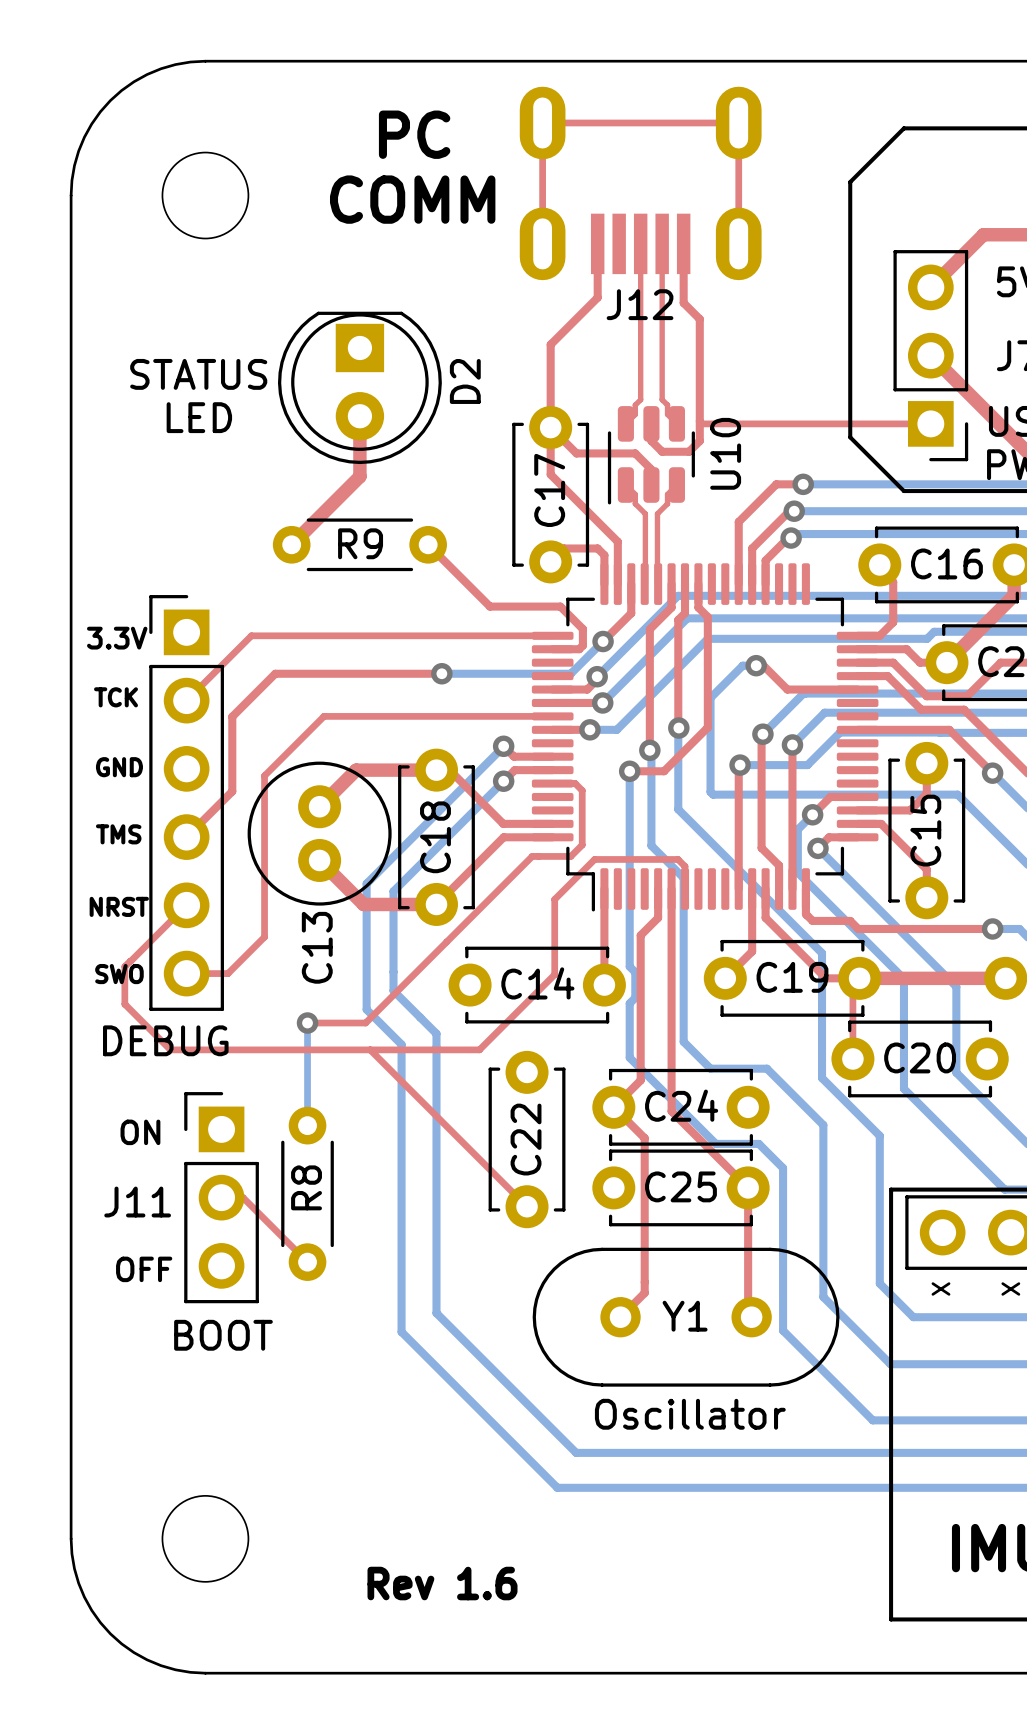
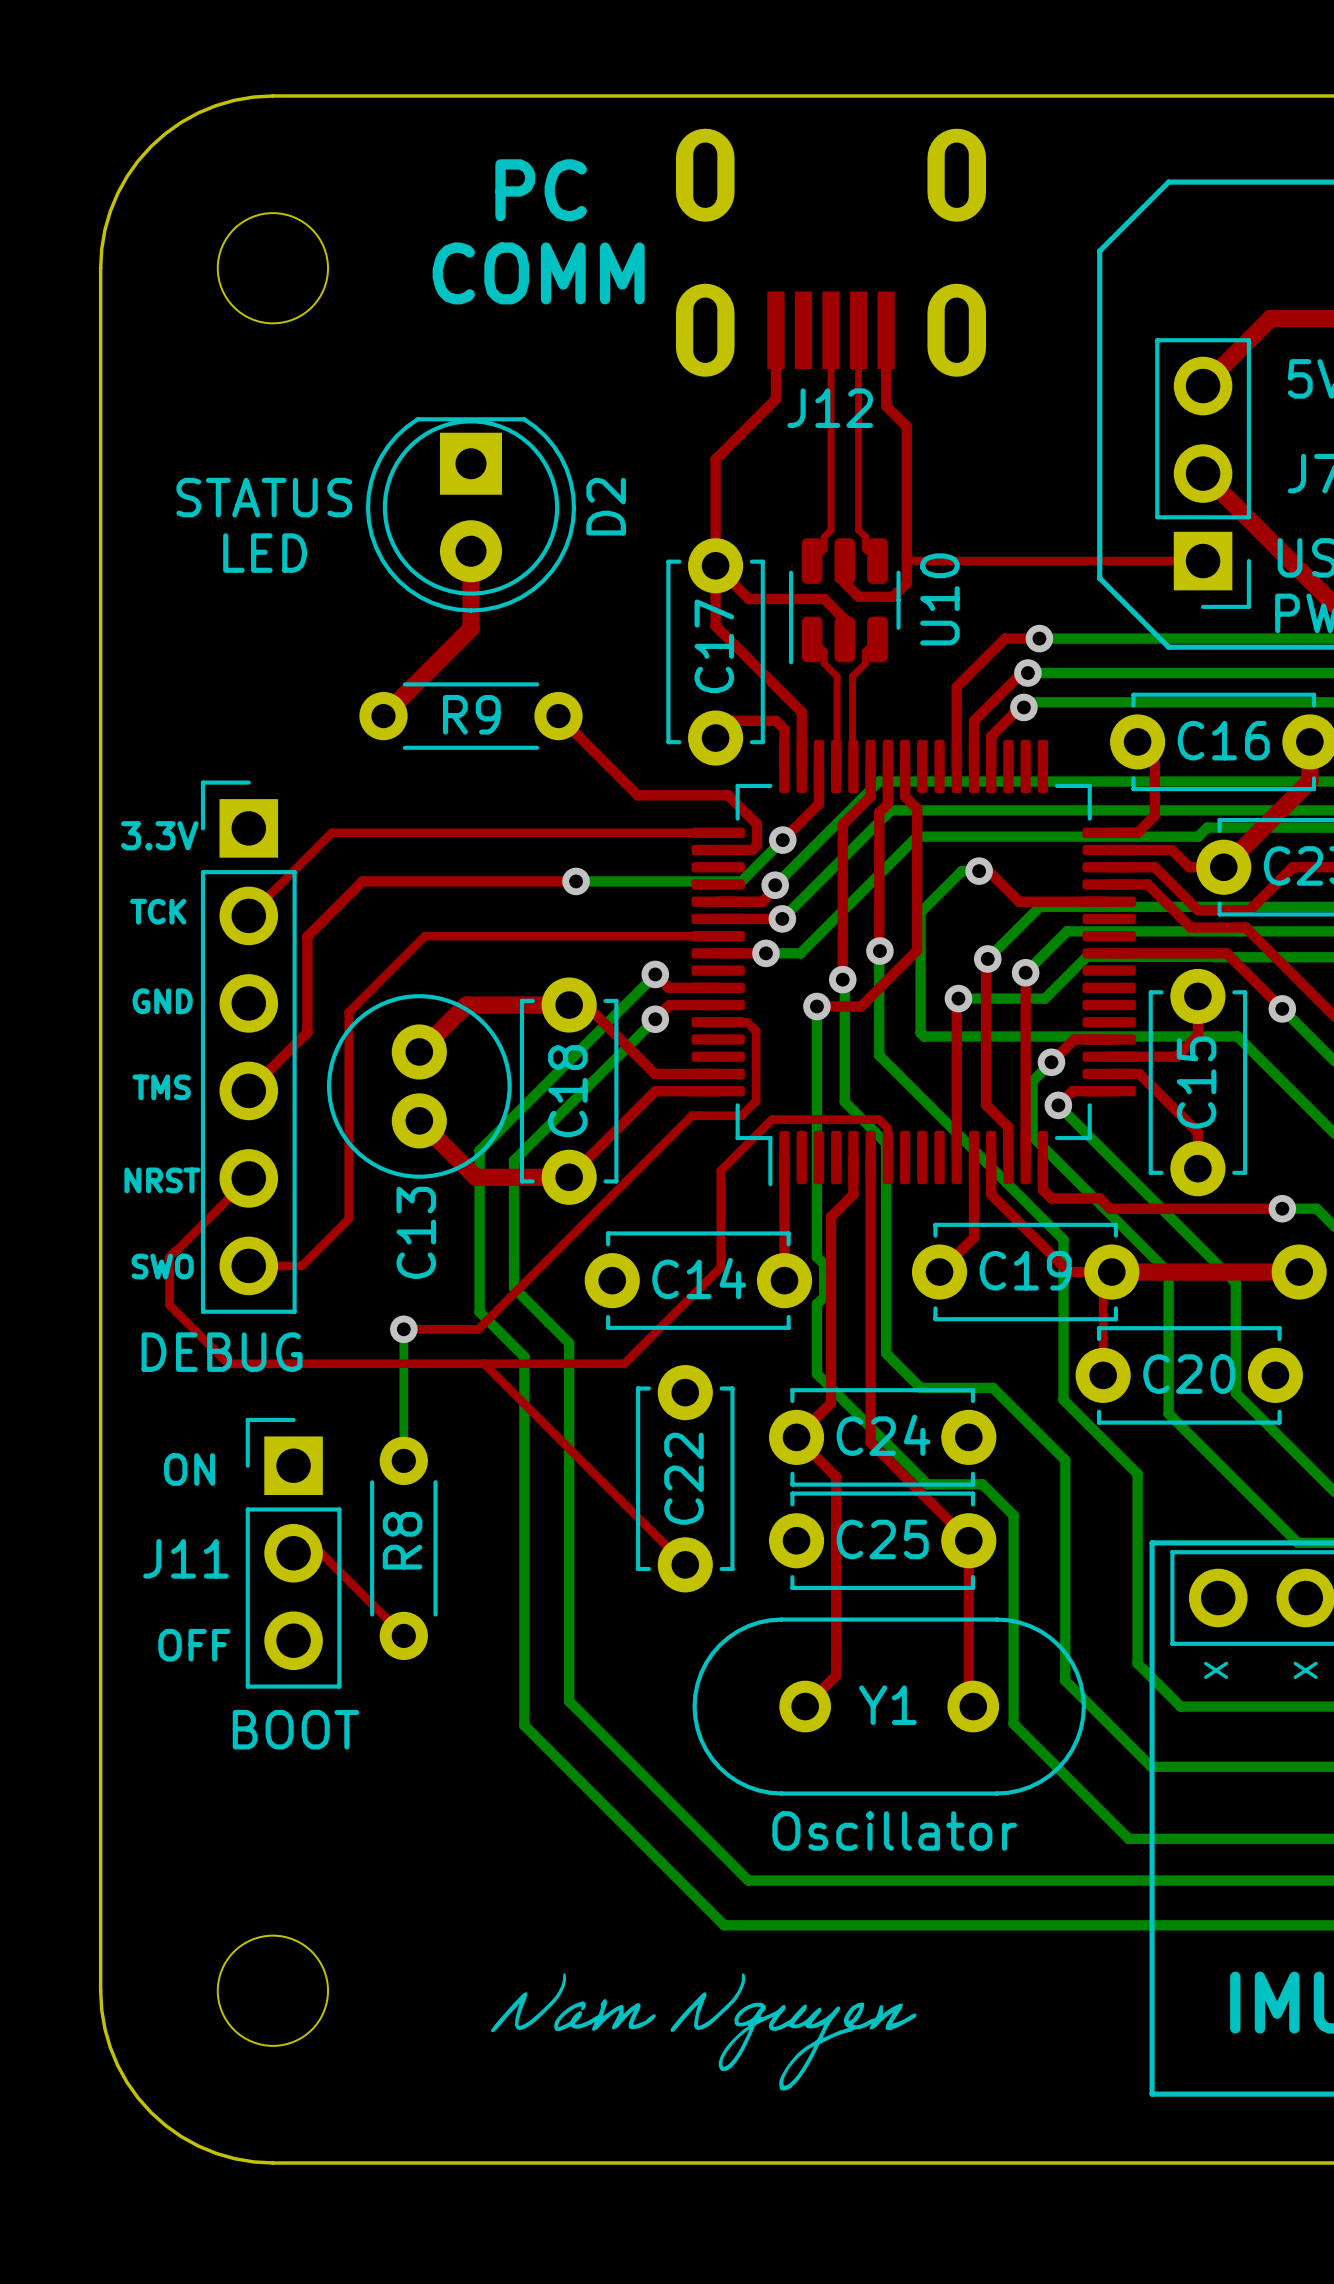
top track: (542, 243) (542, 122) (738, 122) (738, 243) -> none
drawing: none -> [491, 1973, 917, 2091]
text: Rev 1.6 (442, 1583) -> none

